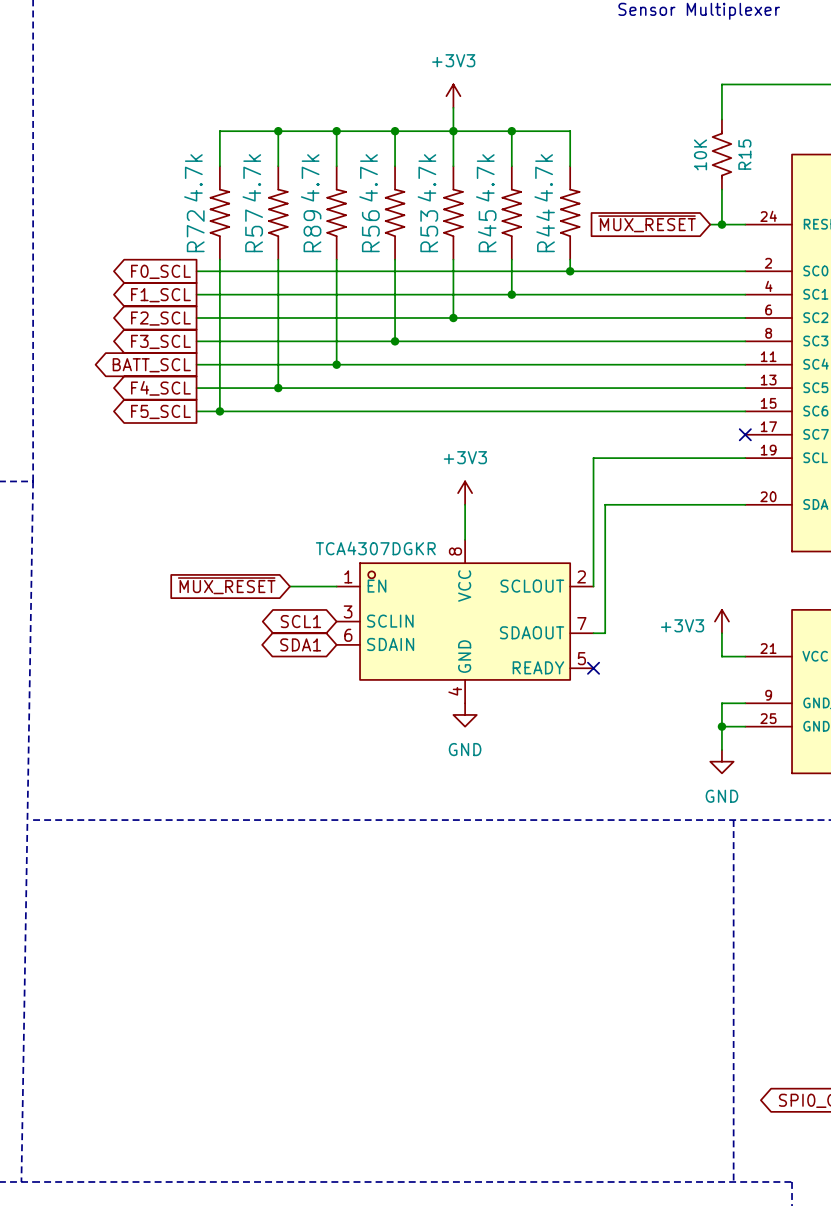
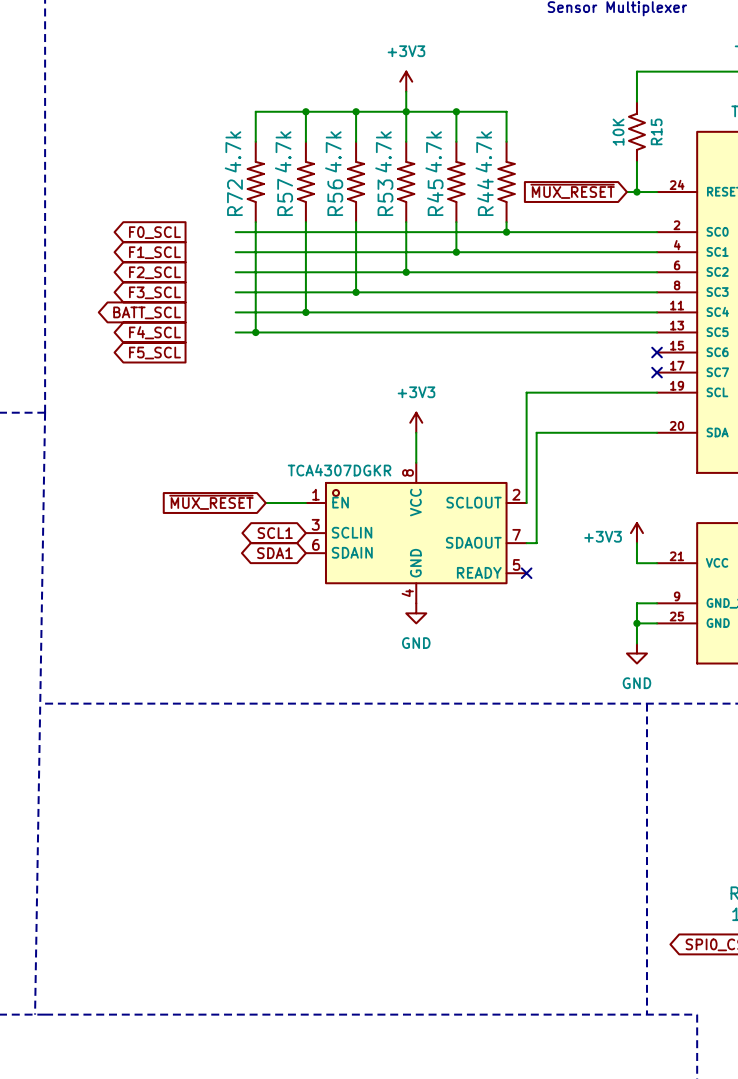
wire: (278, 131) (219, 131) (219, 166) -> none
junction: (278, 131) -> none
R72: 4.7k (219, 212) -> none
R57 name: R57 (254, 230) -> R72 (234, 197)
R89 name: R89 (312, 231) -> R57 (285, 197)
wire: (219, 259) (219, 411) -> none
wire: (196, 271) (254, 271) -> none
wire: (196, 294) (254, 294) -> none
wire: (196, 317) (254, 317) -> none
wire: (196, 341) (254, 341) -> none
wire: (196, 364) (254, 364) -> none
wire: (196, 388) (254, 388) -> none
wire: (196, 411) (745, 411) -> none
junction: (219, 411) -> none
no-connect mark: none -> (657, 352)

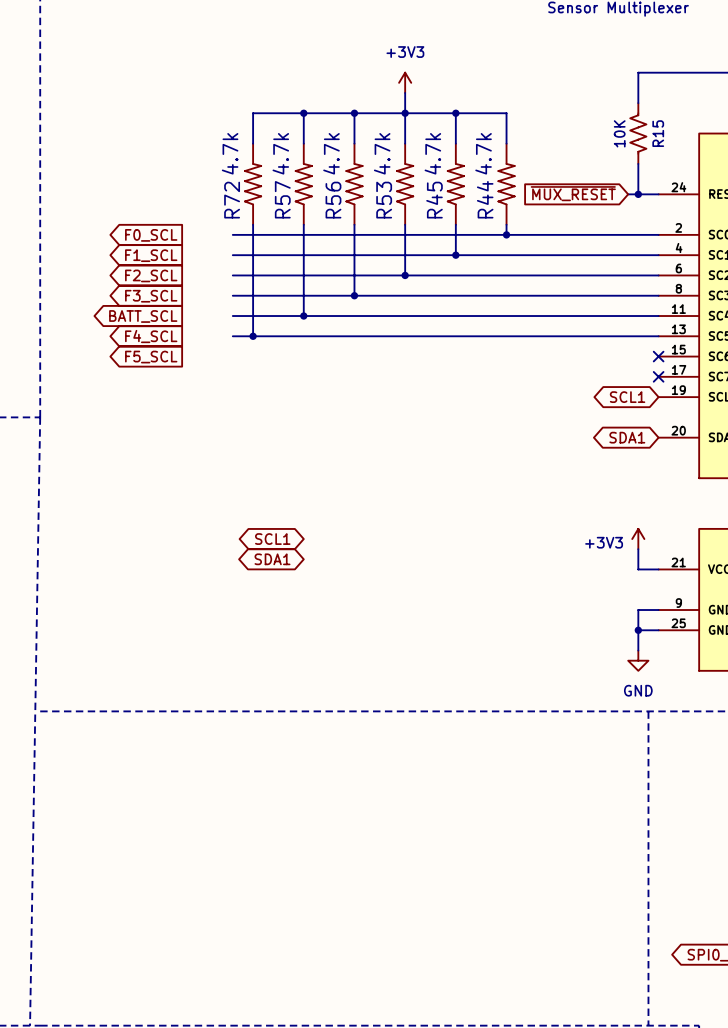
global label: none -> SCL1 (627, 397)
wire: (657, 392) (526, 392) (526, 503) -> none
power symbol: +3V3 (416, 422) -> none
wire: (416, 432) (416, 462) -> none
global label: none -> SDA1 (627, 437)
wire: (657, 432) (536, 432) (536, 543) (526, 543) -> none
global label: ~{MUX_RESET} (211, 502) -> none
wire: (265, 503) (305, 503) -> none
part: TCA4307DGKR (416, 533) -> none
no-connect mark: (526, 573) -> none
power symbol: GND (416, 613) -> none

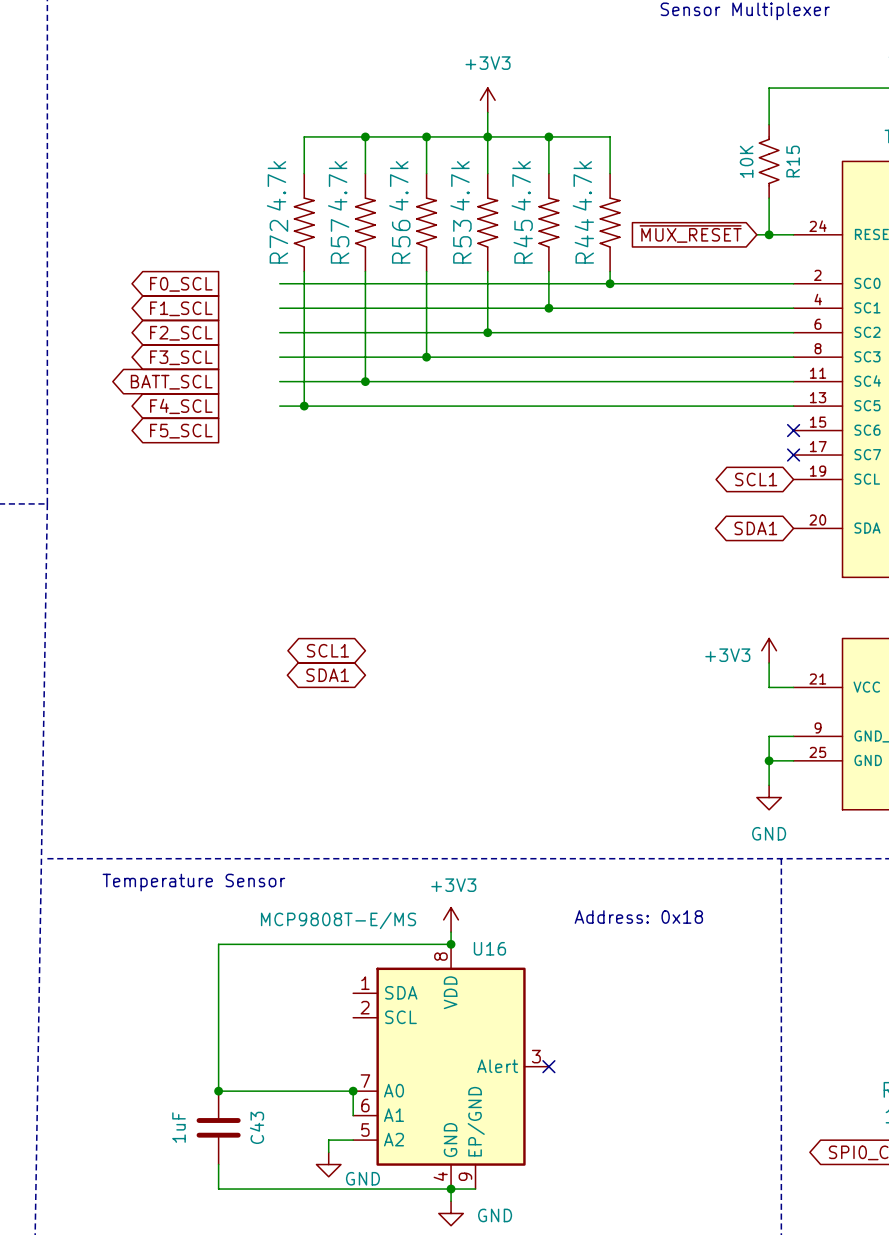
text: none -> Temperature Sensor (193, 882)
text: none -> Address: 0x18 (638, 917)
power symbol: none -> +3V3 (451, 919)
wire: none -> (451, 932) (451, 944) (218, 944) (218, 1091) (353, 1091) (353, 1115)
junction: none -> (451, 944)
U16: none -> MCP9808T-E/MS (451, 1066)
no-connect mark: none -> (548, 1066)
junction: none -> (218, 1091)
junction: none -> (353, 1091)
C43: none -> 1uF (218, 1127)
wire: none -> (353, 1140) (328, 1140) (328, 1152)
wire: none -> (218, 1164) (218, 1189) (475, 1189)
power symbol: none -> GND (328, 1164)
wire: none -> (451, 1189) (451, 1201)
junction: none -> (451, 1189)
power symbol: none -> GND (451, 1213)

